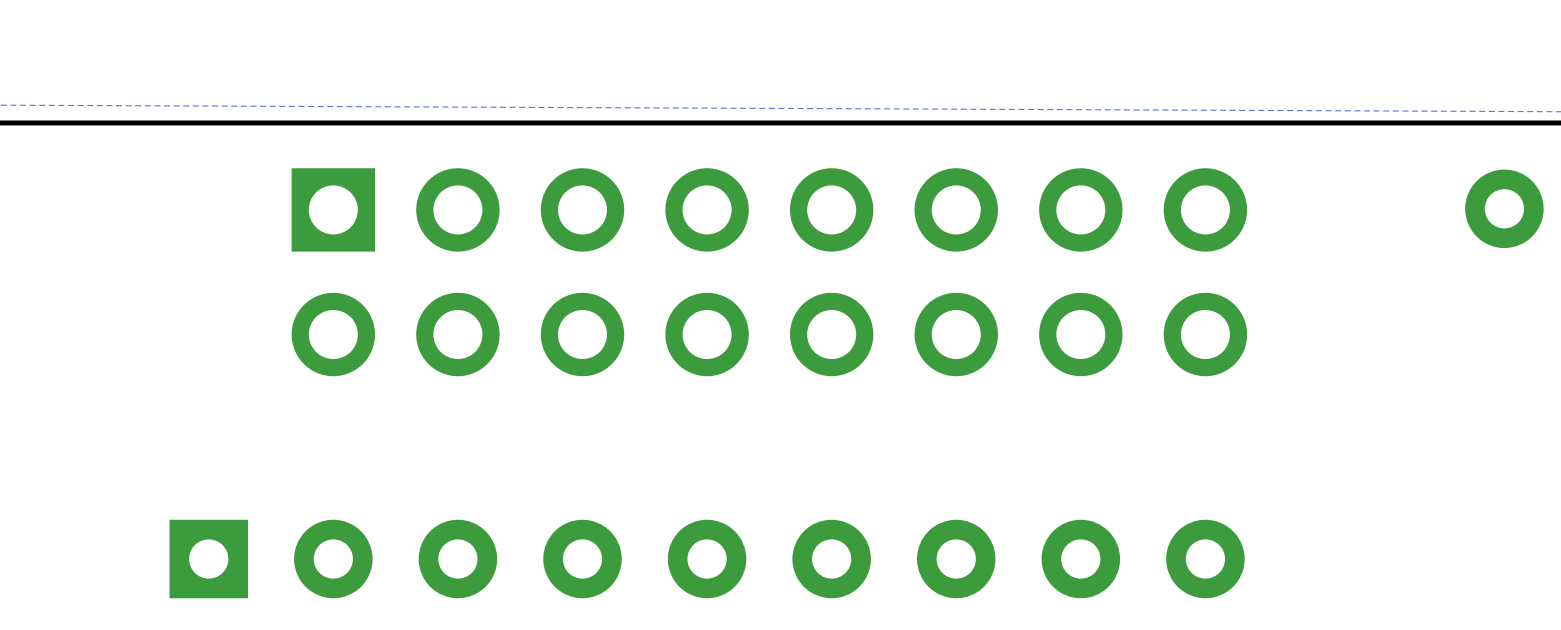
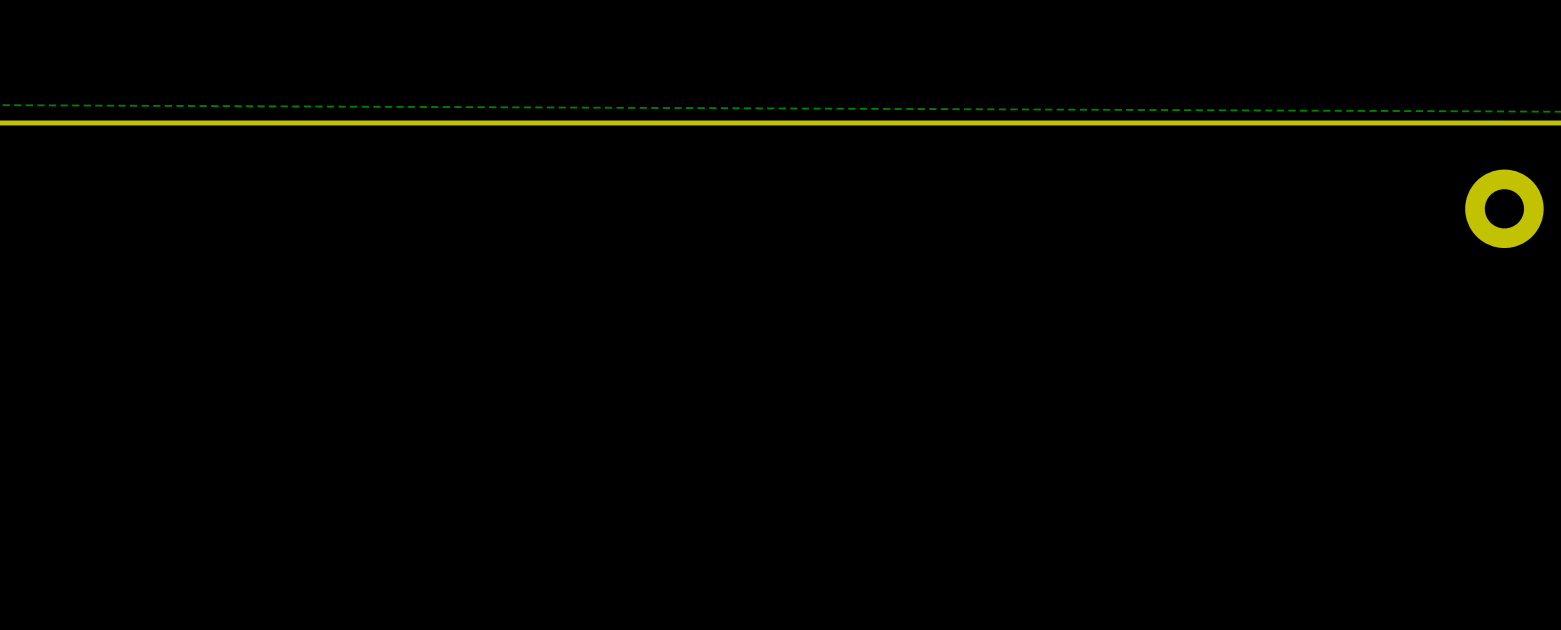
part: (769, 272) -> none
part: (707, 559) -> none

